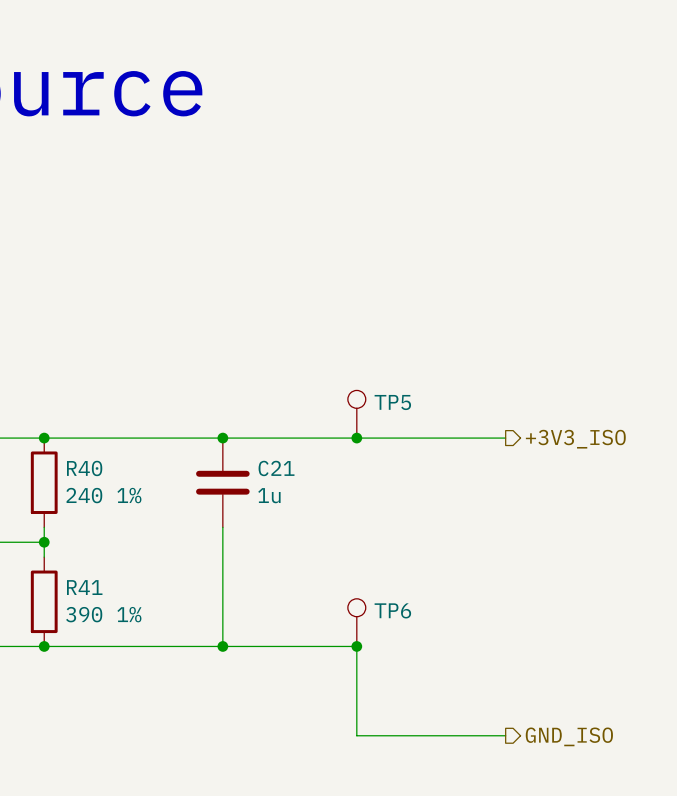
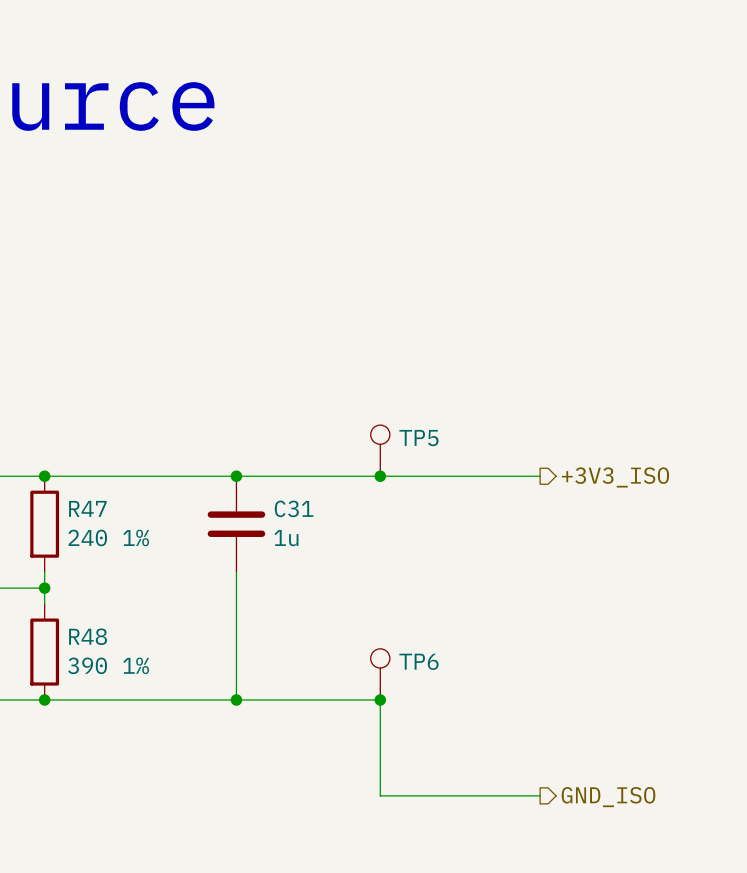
R40 name: R40 (84, 468) -> R47 (87, 508)
C21 name: C21 (276, 468) -> C31 (294, 508)
R41 name: R41 (84, 587) -> R48 (88, 636)

